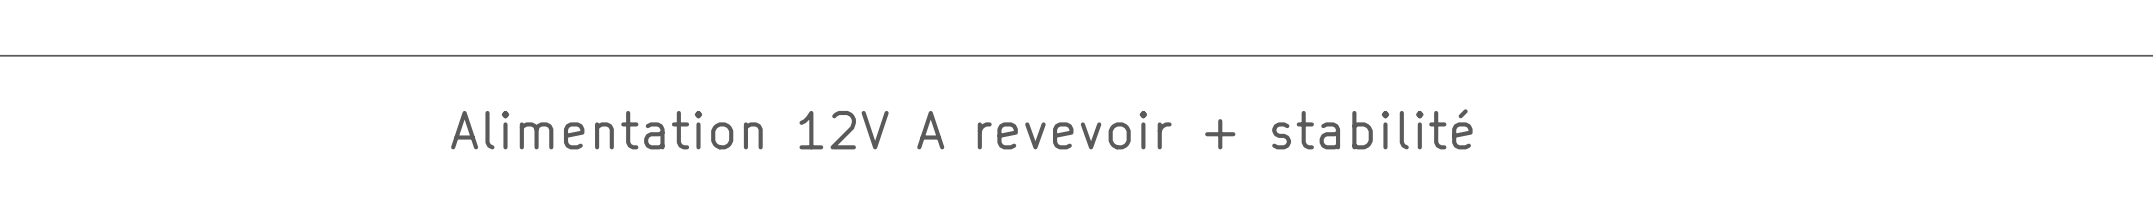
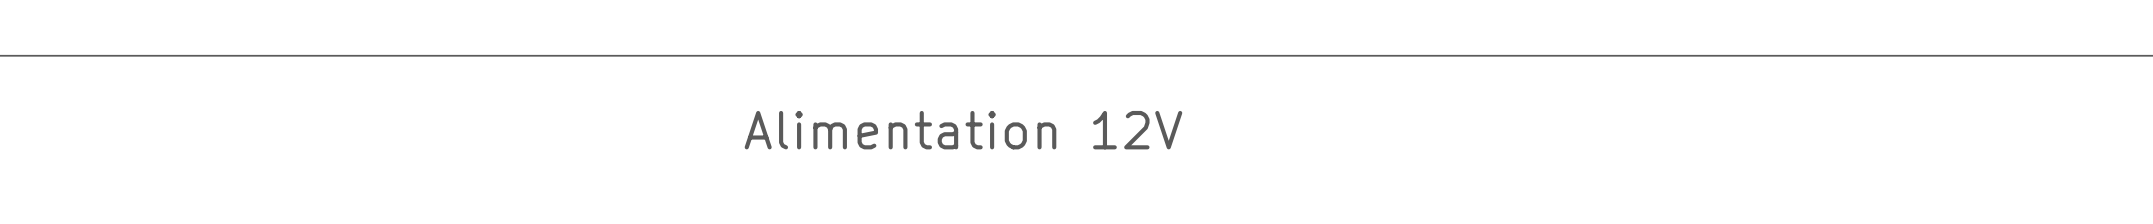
text: Alimentation 12V A revevoir + stabilité (961, 129) -> Alimentation 12V (963, 130)

